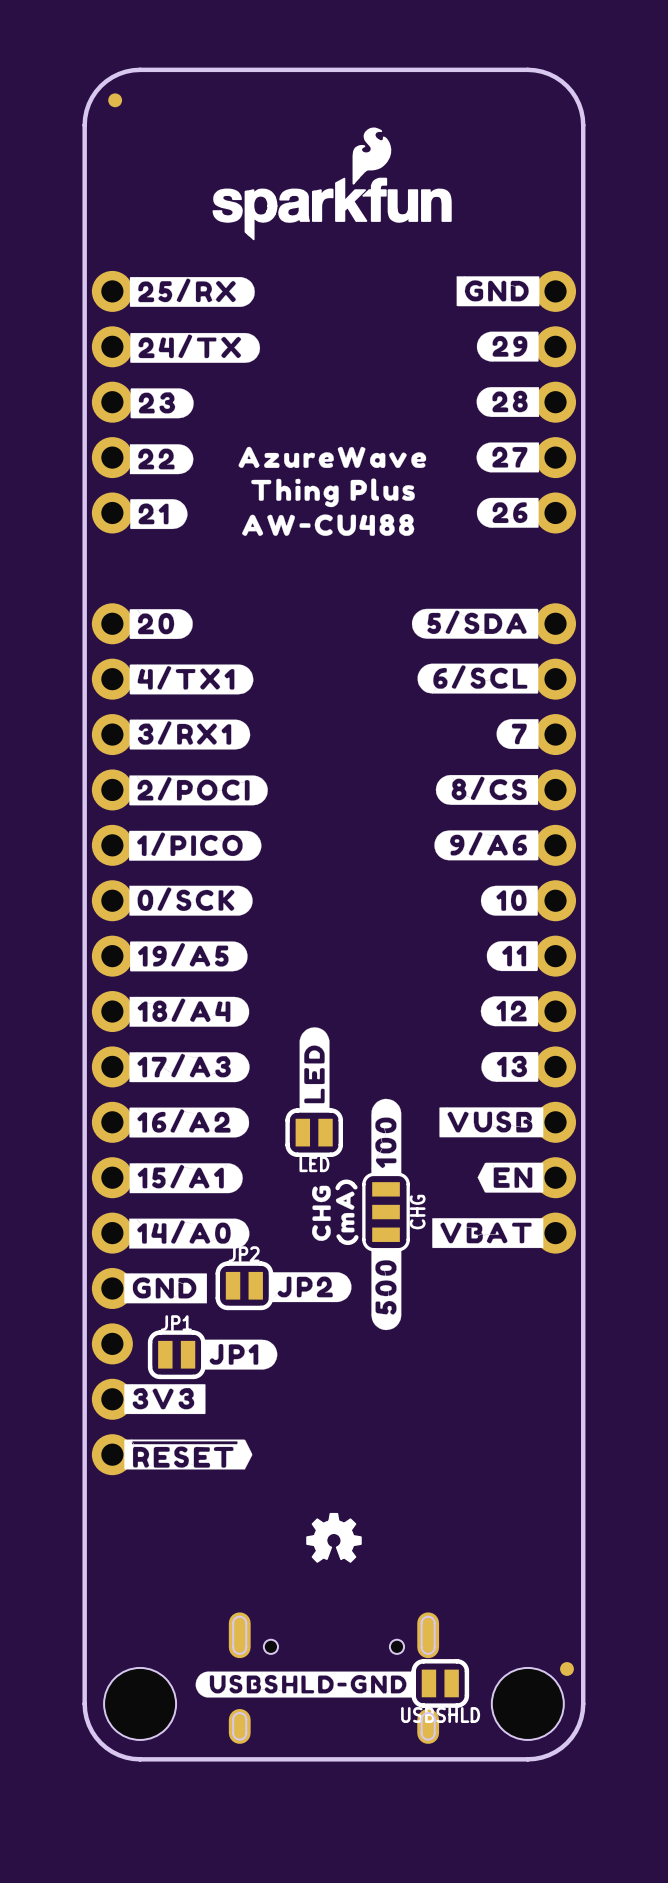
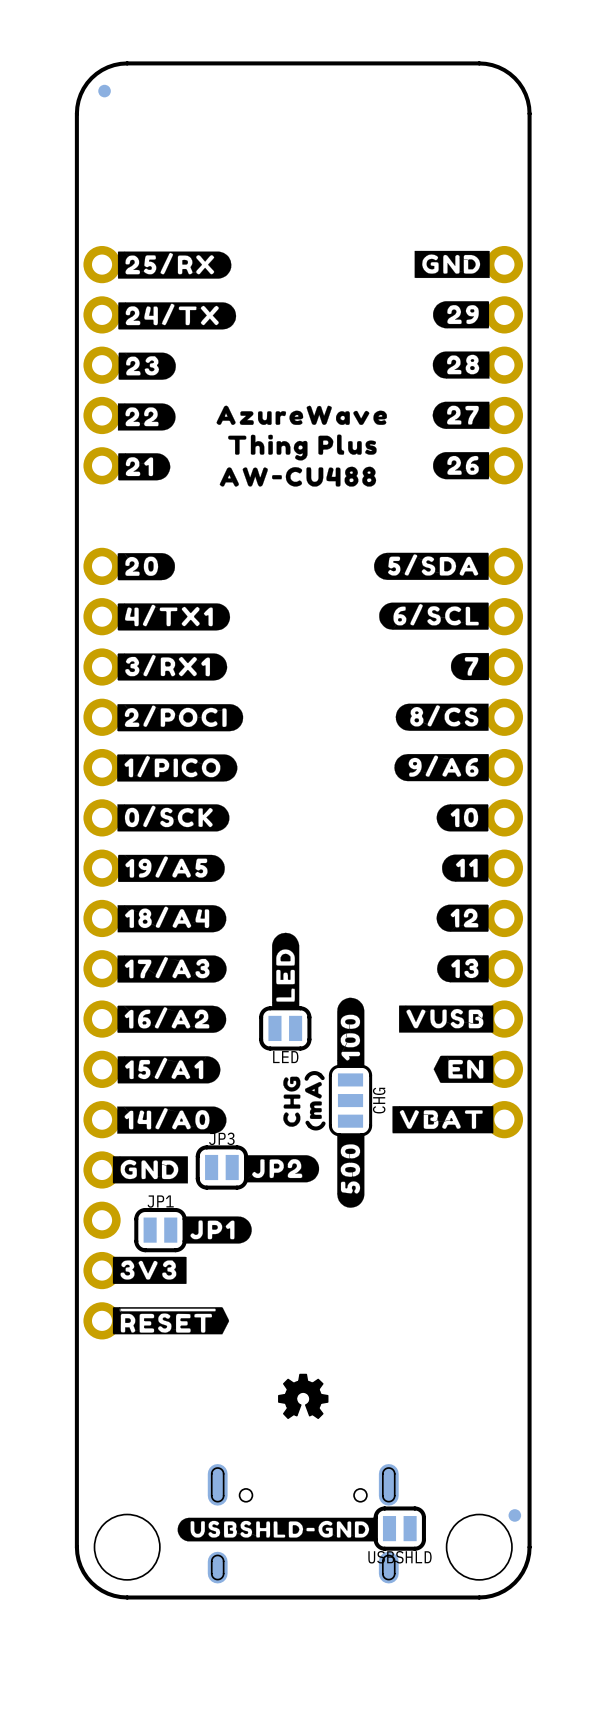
drawing: [212, 127, 452, 241] -> none
JP2 name: JP2 (244, 1254) -> JP3 (221, 1138)

